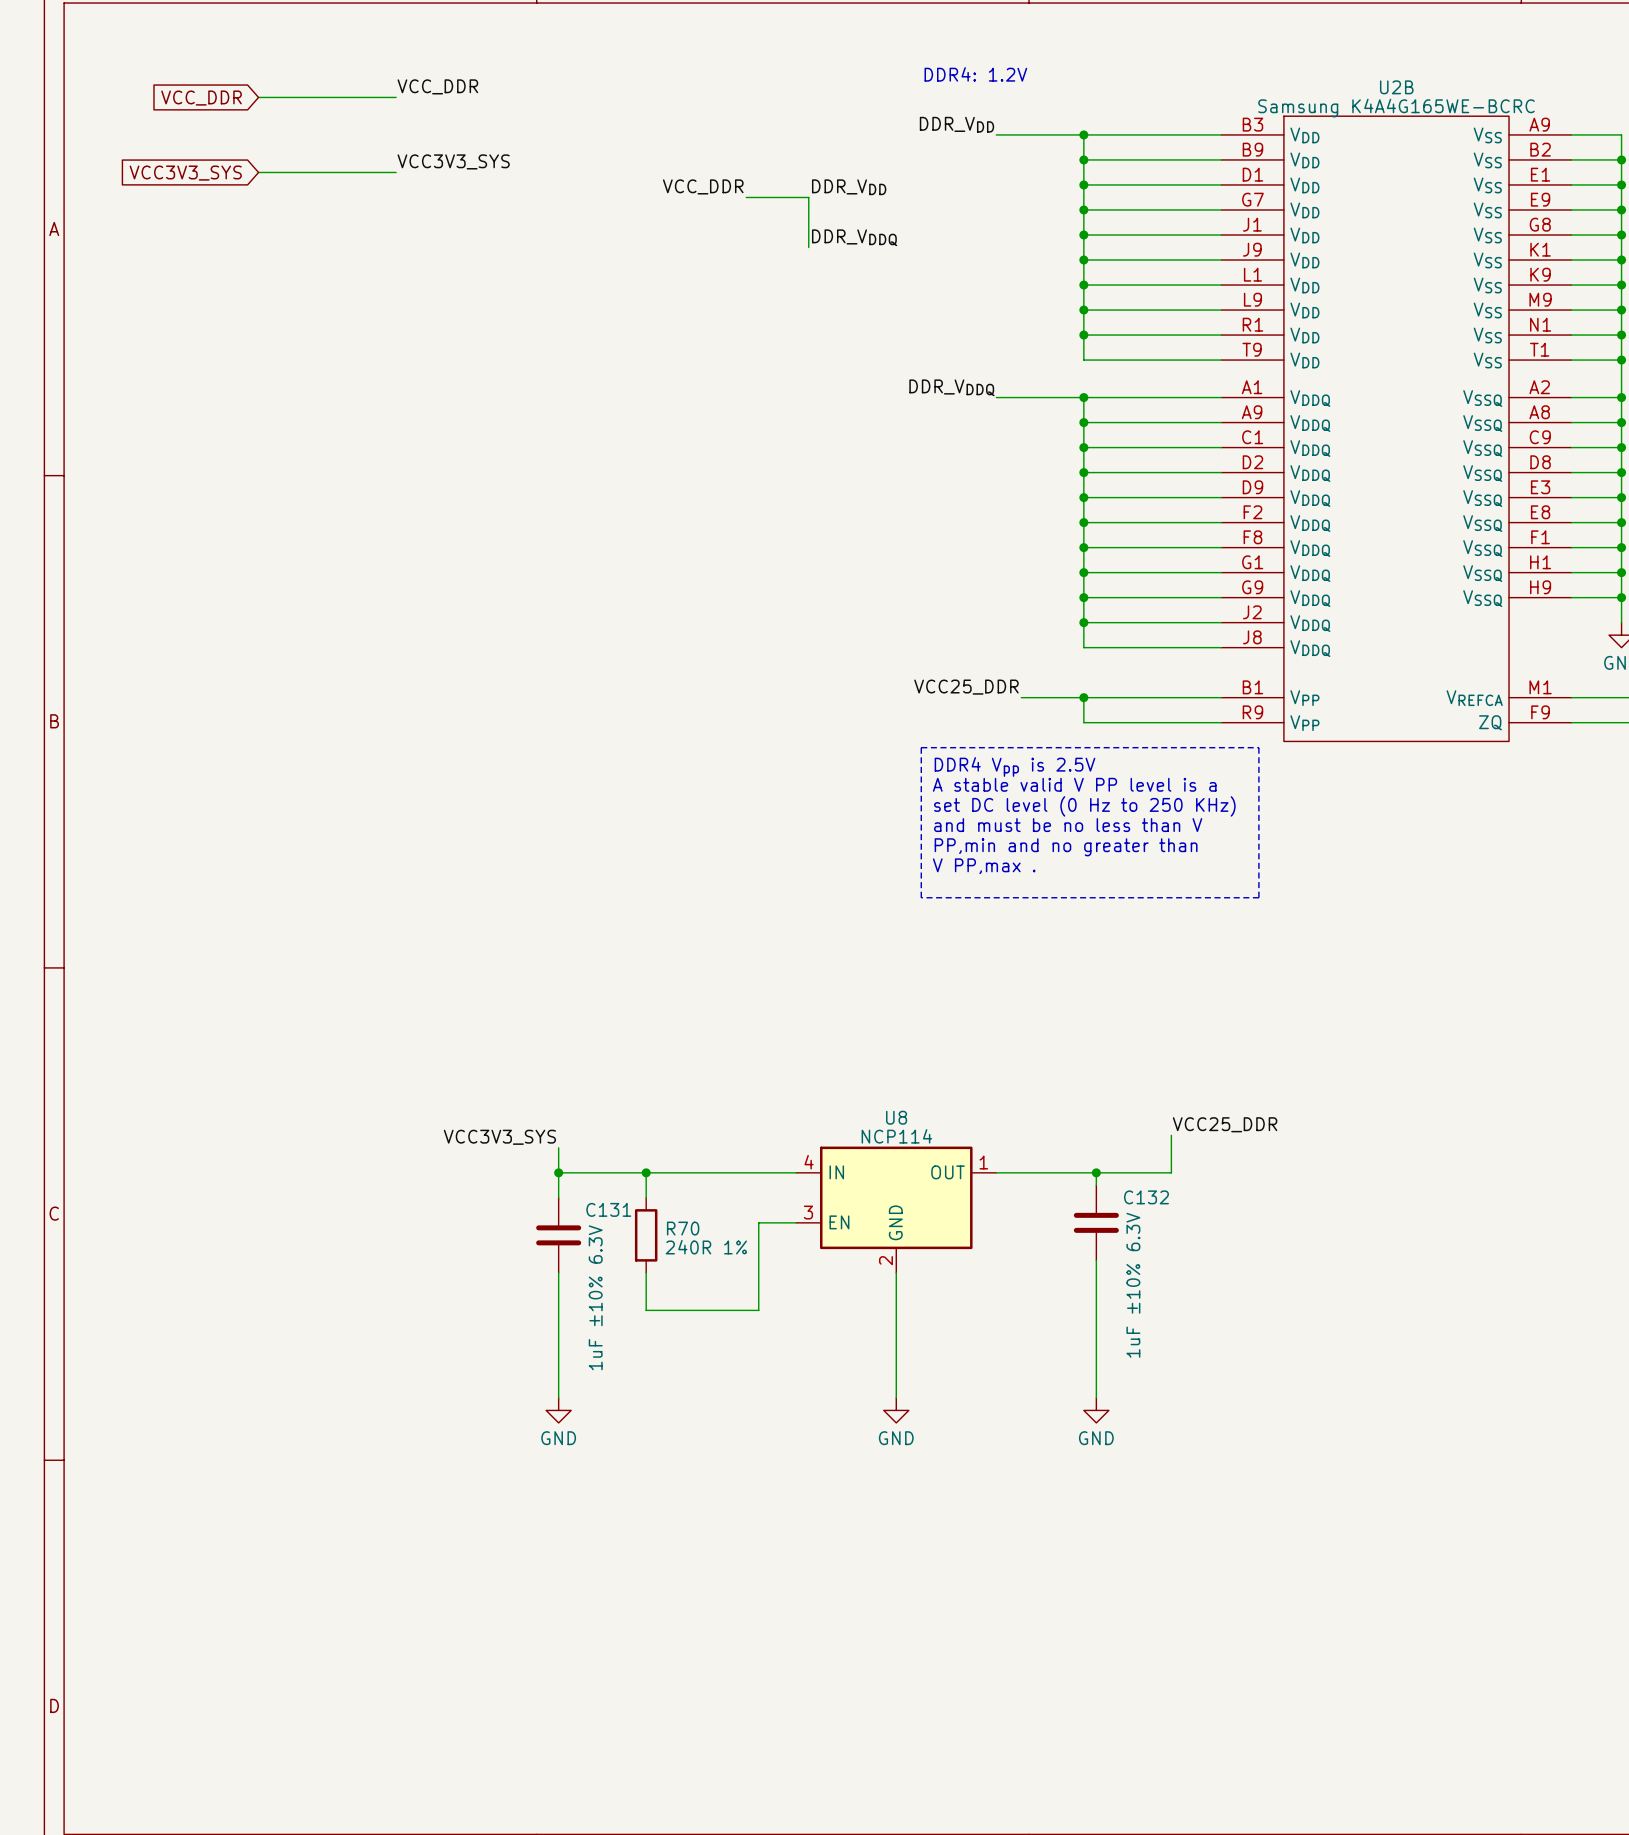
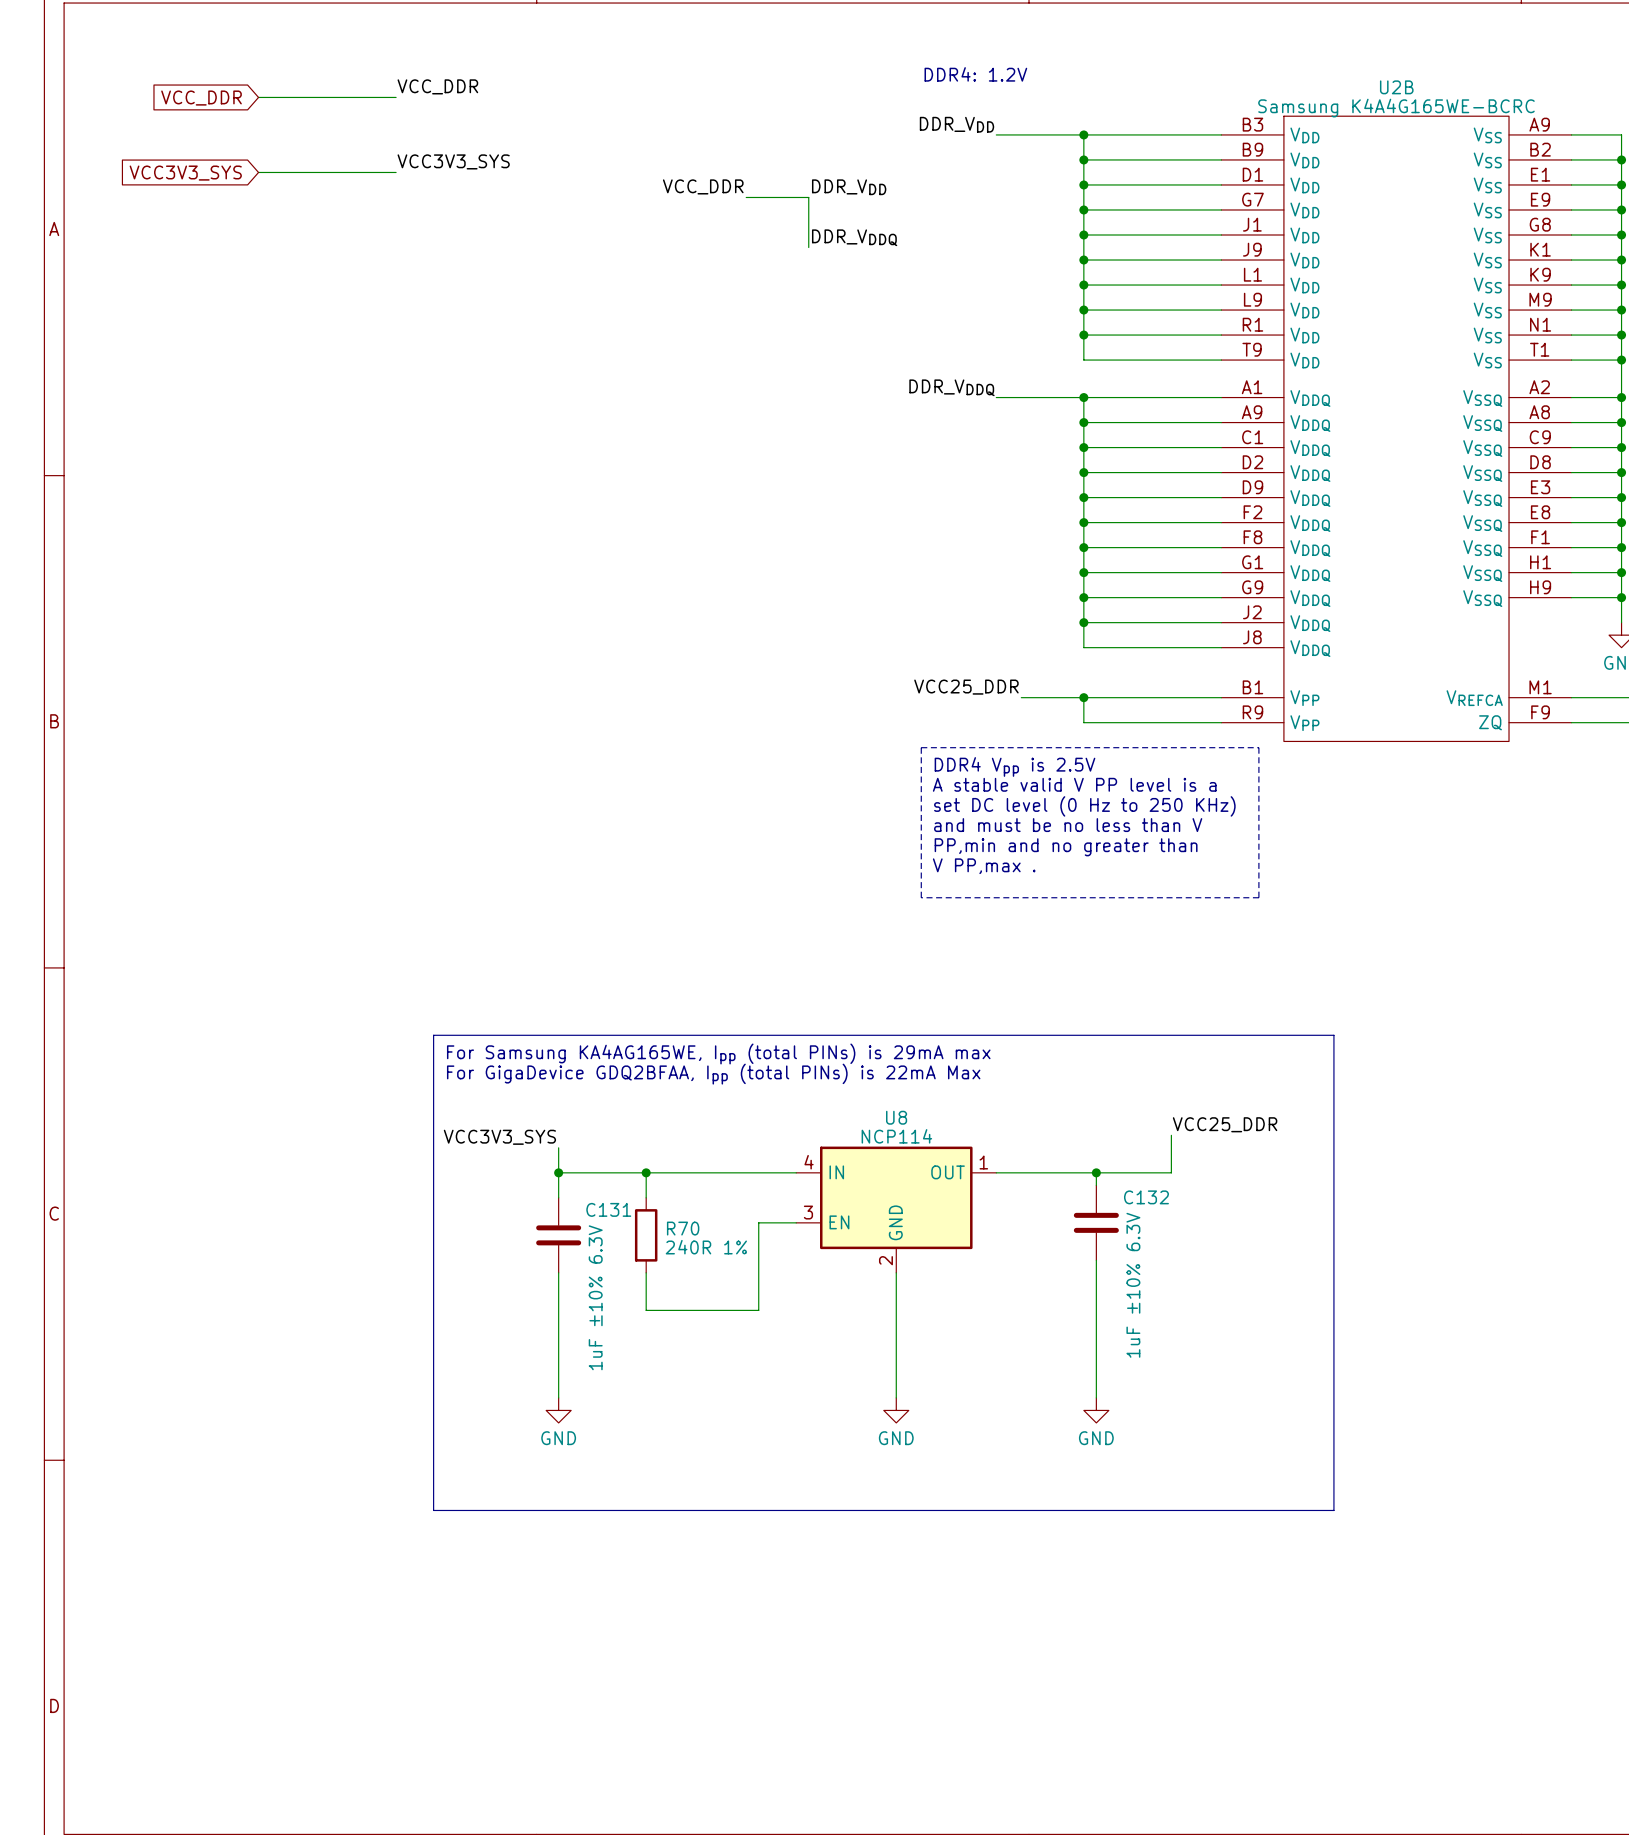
line: none -> (433, 1035) (1333, 1035) (1333, 1510) (433, 1510) (433, 1035)
text: none -> For Samsung KA4AG165WE, Ipp (total PINs) is 29mA max (718, 1053)
text: none -> For GigaDevice GDQ2BFAA, Ipp (total PINs) is 22mA Max (713, 1074)

